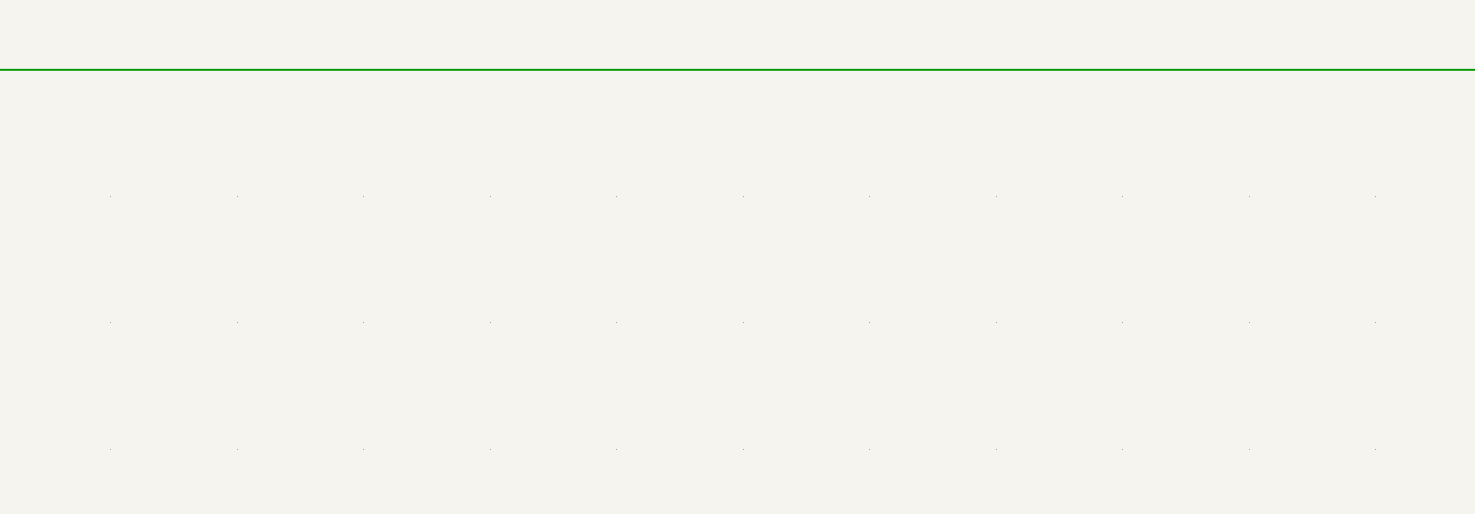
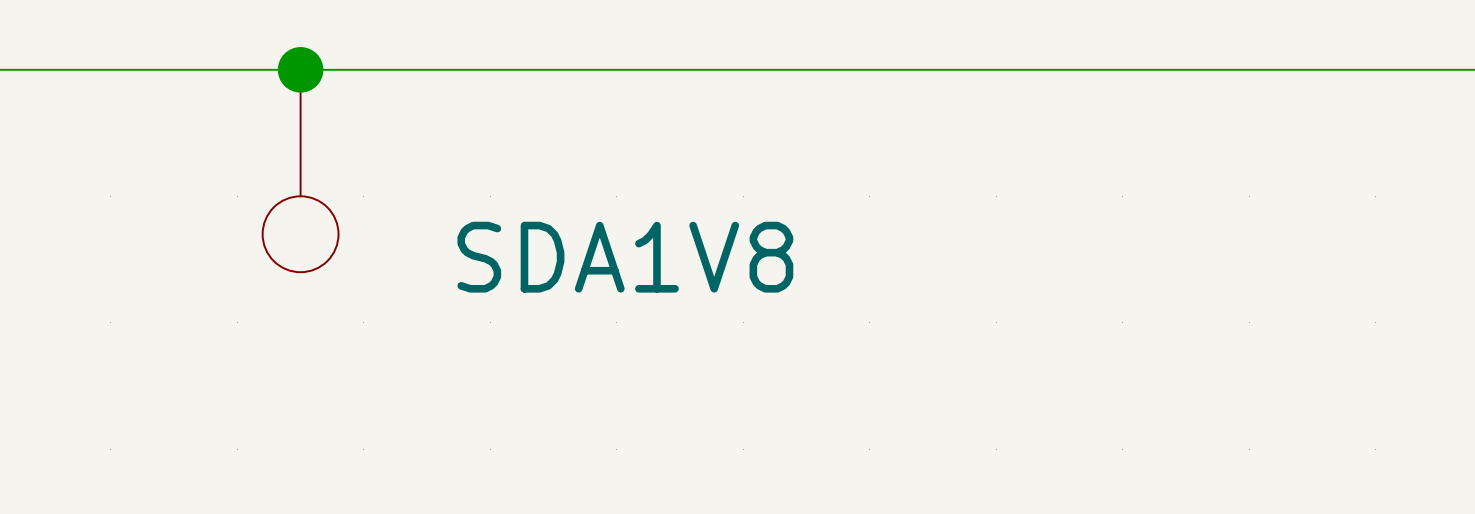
junction: none -> (300, 69)
SDA1V8: none -> (300, 171)

